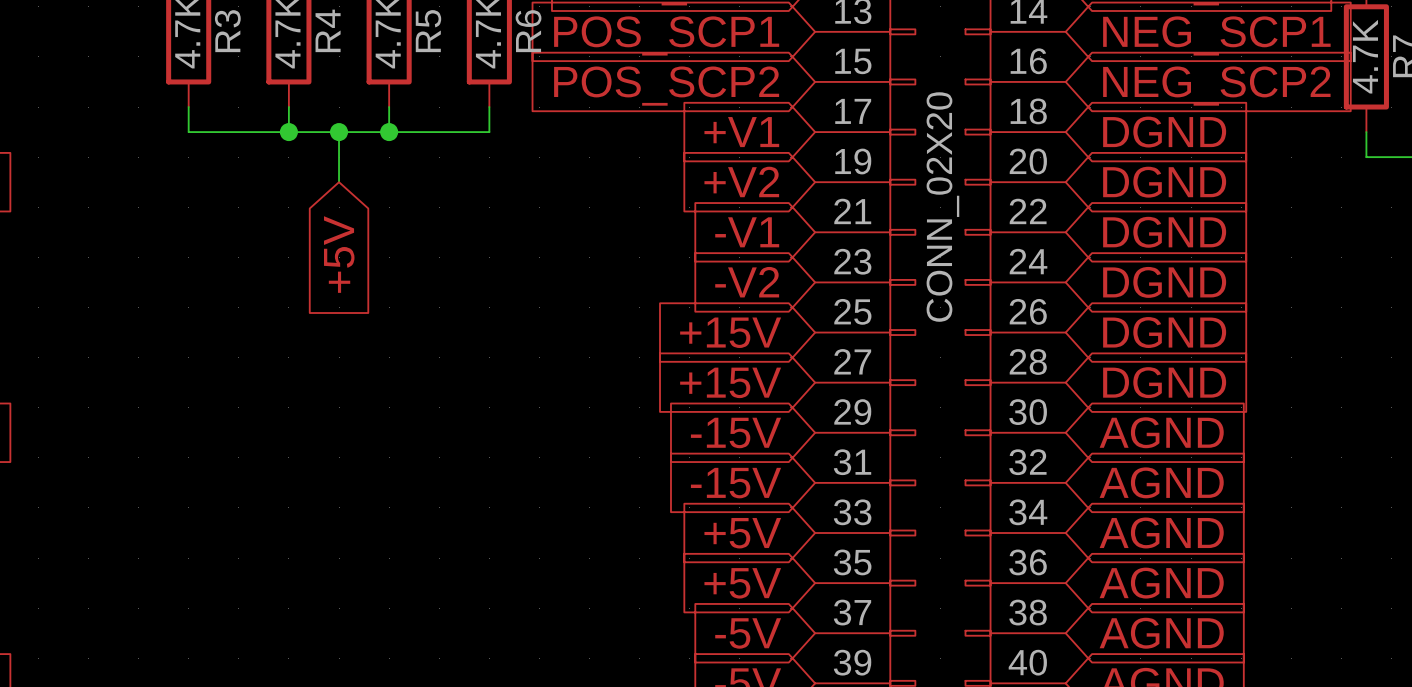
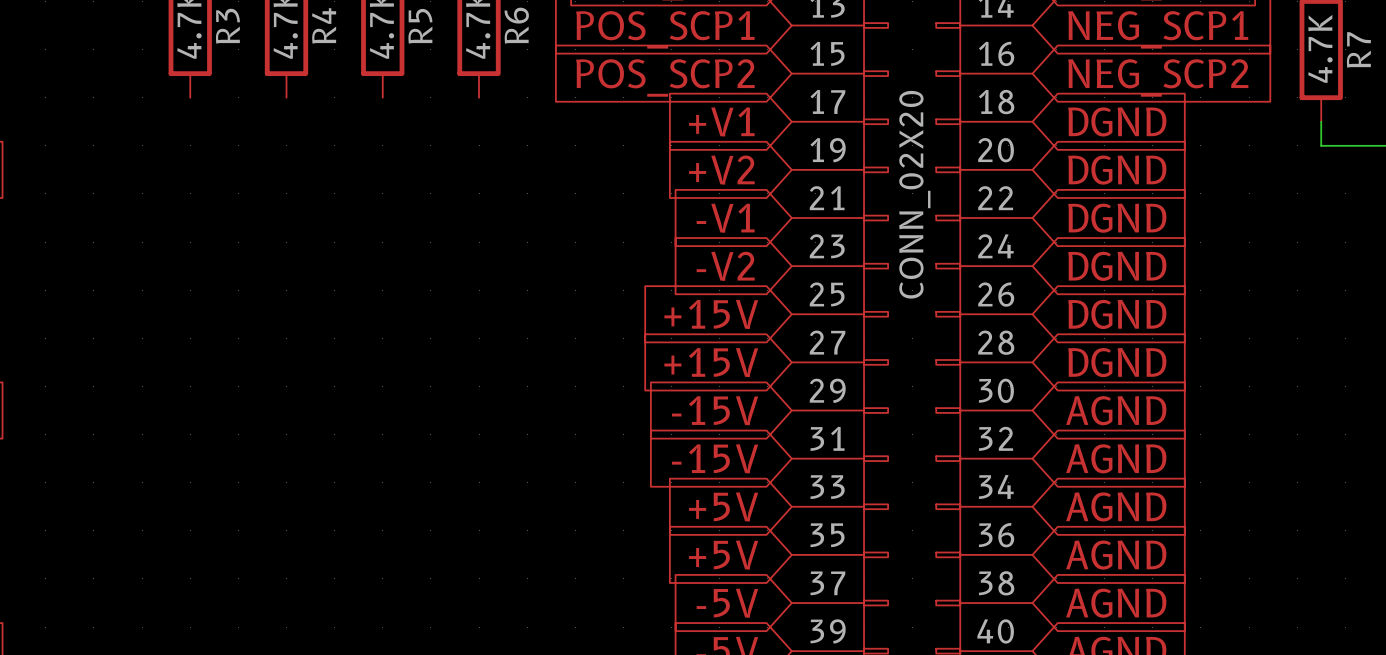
wire: (188, 107) (188, 132) (489, 132) (489, 107) -> none
wire: (288, 107) (288, 132) -> none
wire: (389, 107) (389, 132) -> none
junction: (288, 132) -> none
wire: (339, 132) (339, 182) -> none
junction: (339, 132) -> none
junction: (389, 132) -> none
global label: +5V (339, 254) -> none

